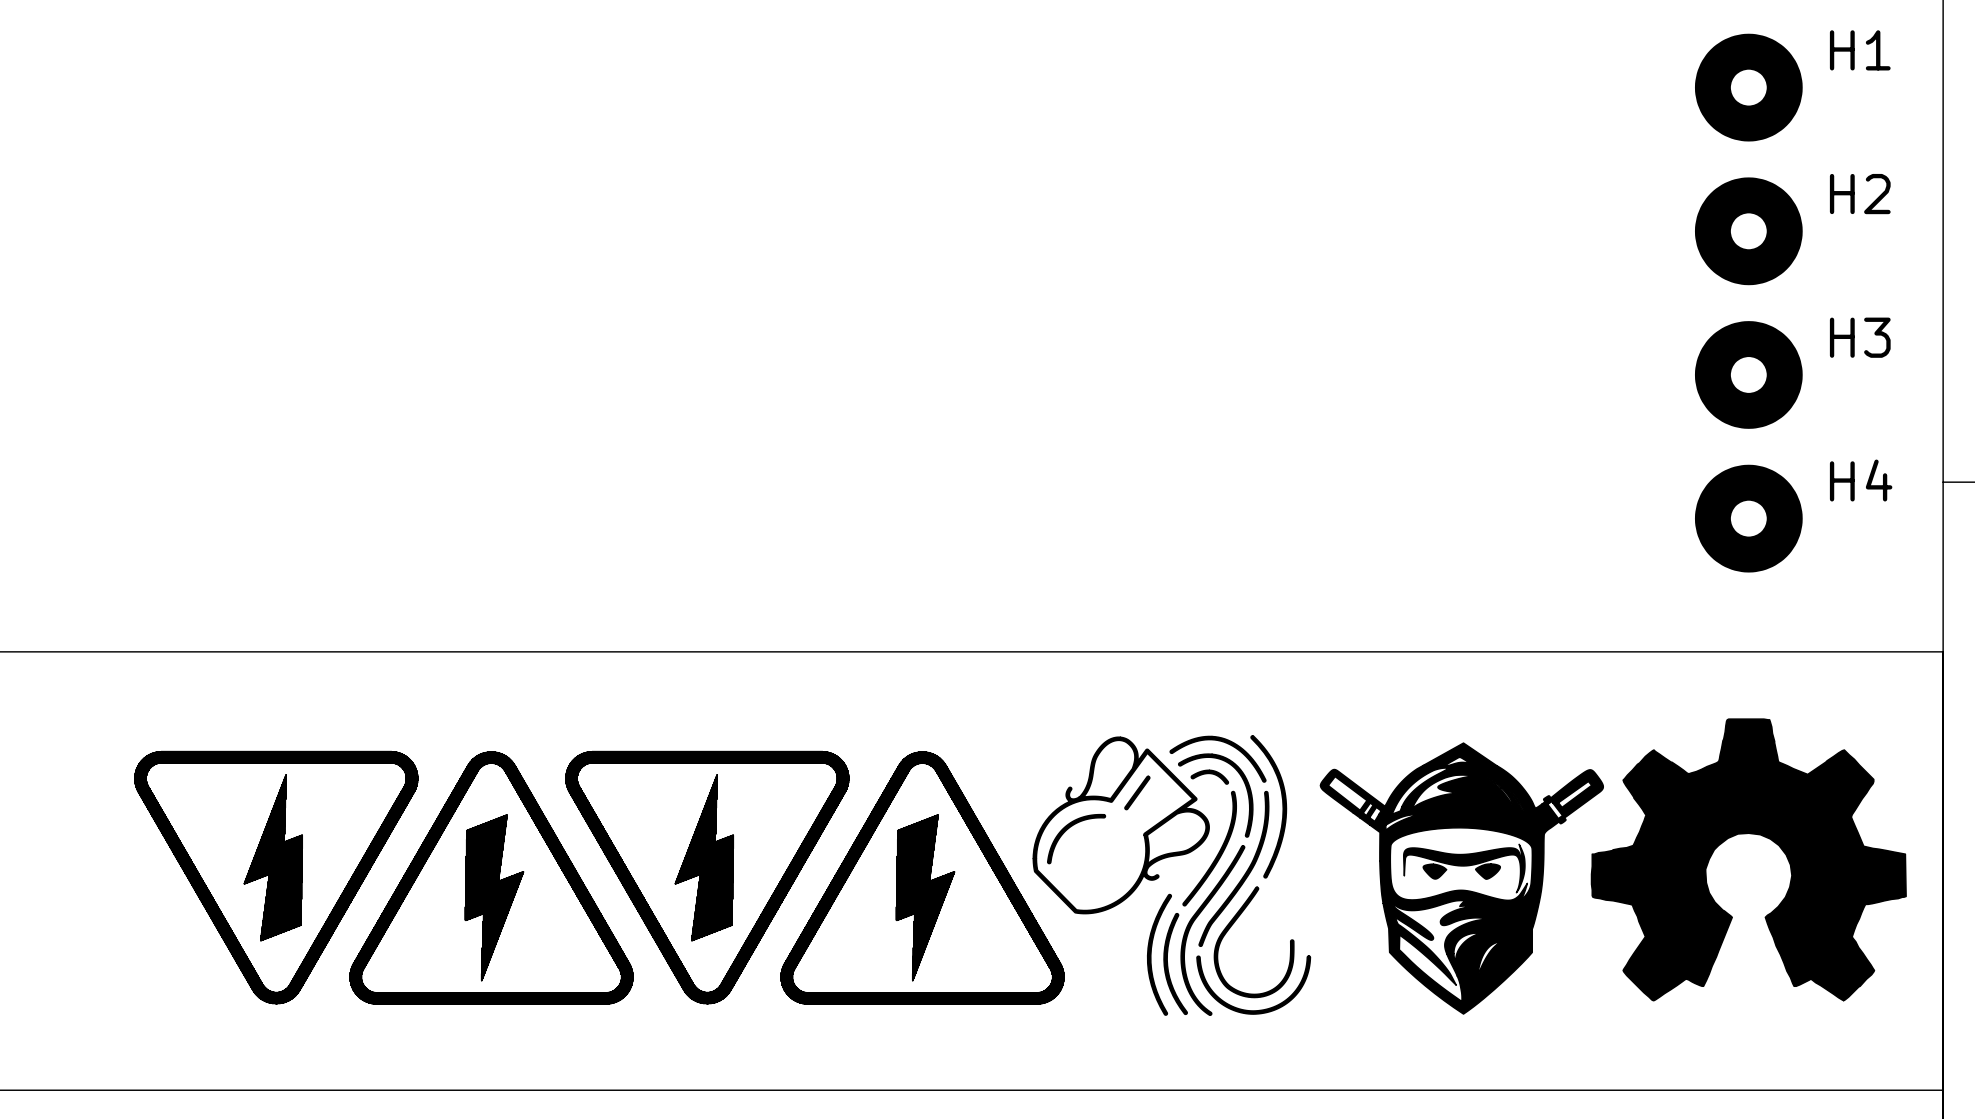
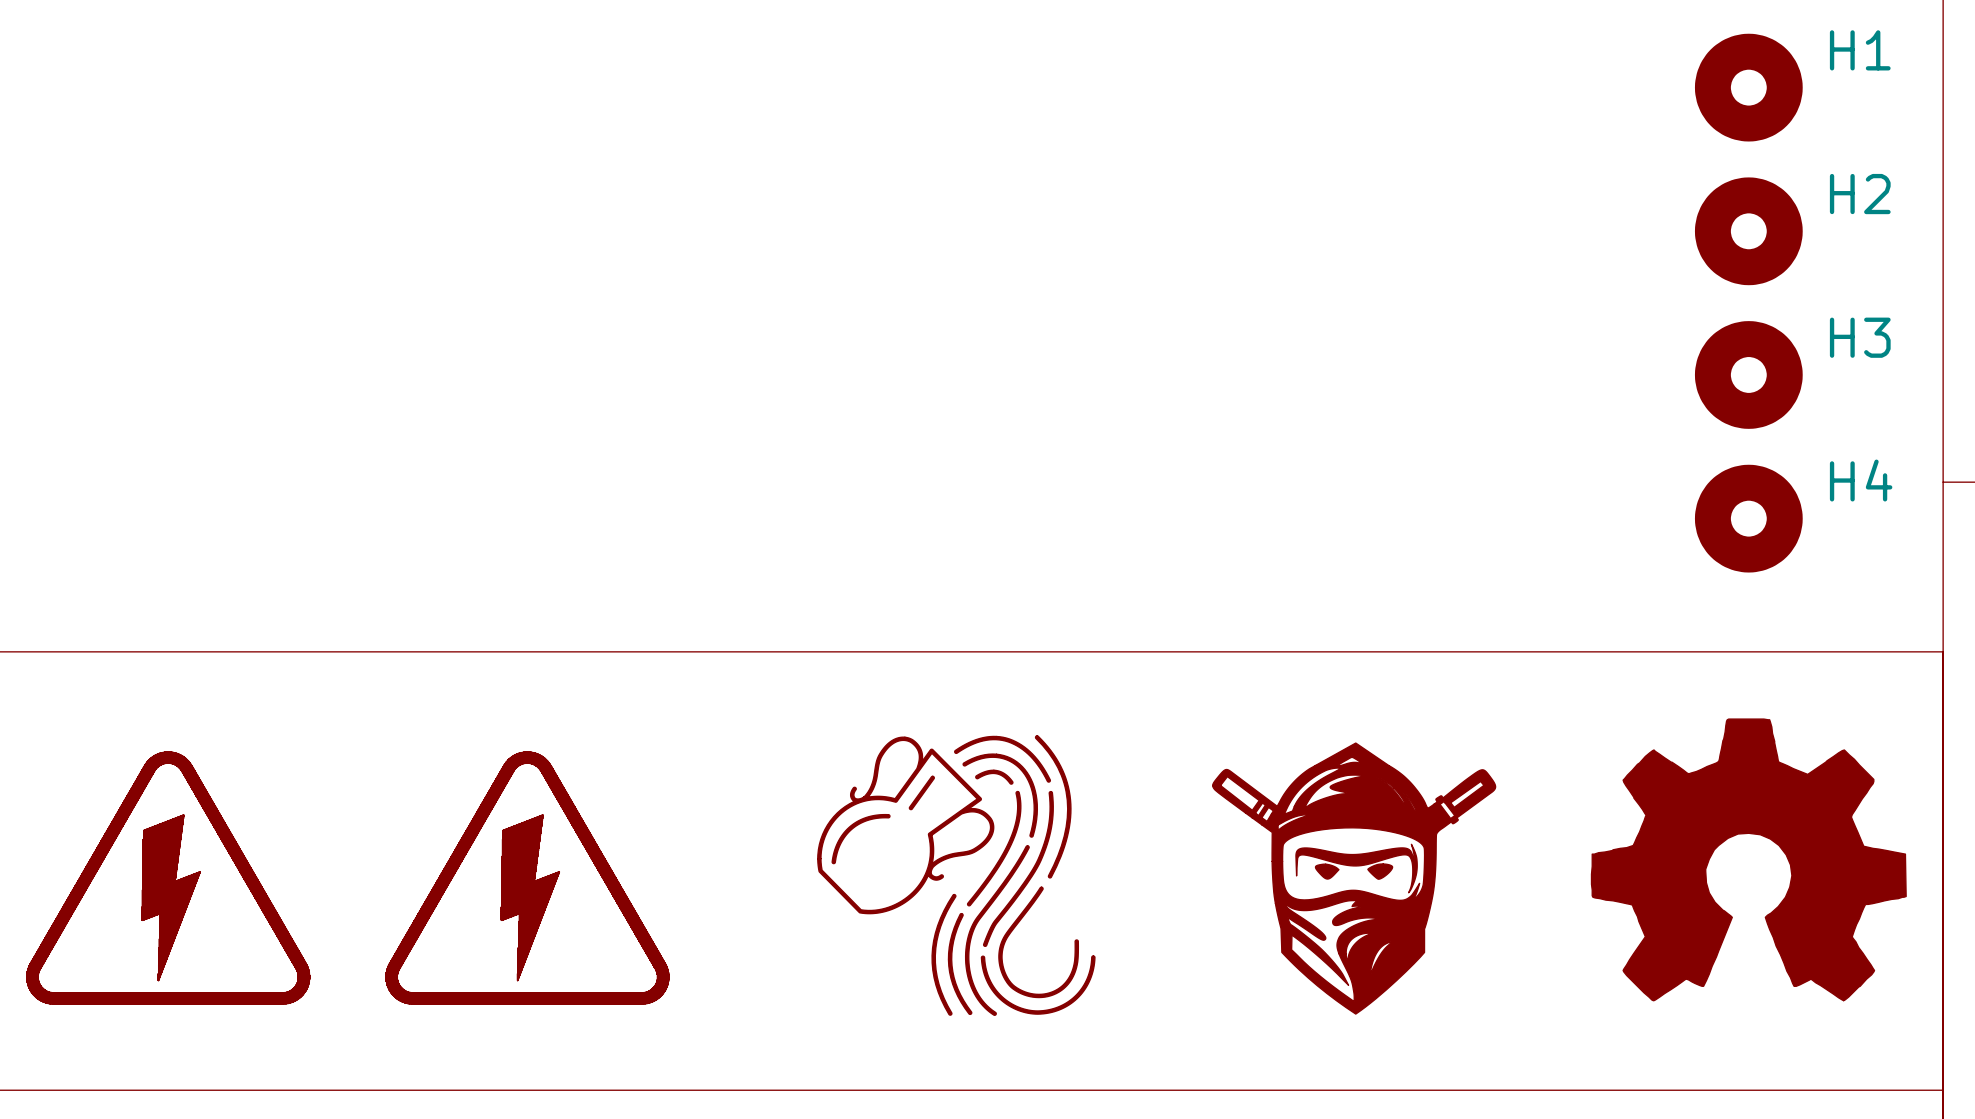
part position: (1171, 875) -> (956, 875)
part rotation: 0° (276, 877) -> 180° (168, 877)
part position: (491, 877) -> (527, 877)
part: (707, 877) -> none
part: (922, 877) -> none
part position: (1461, 878) -> (1354, 878)

